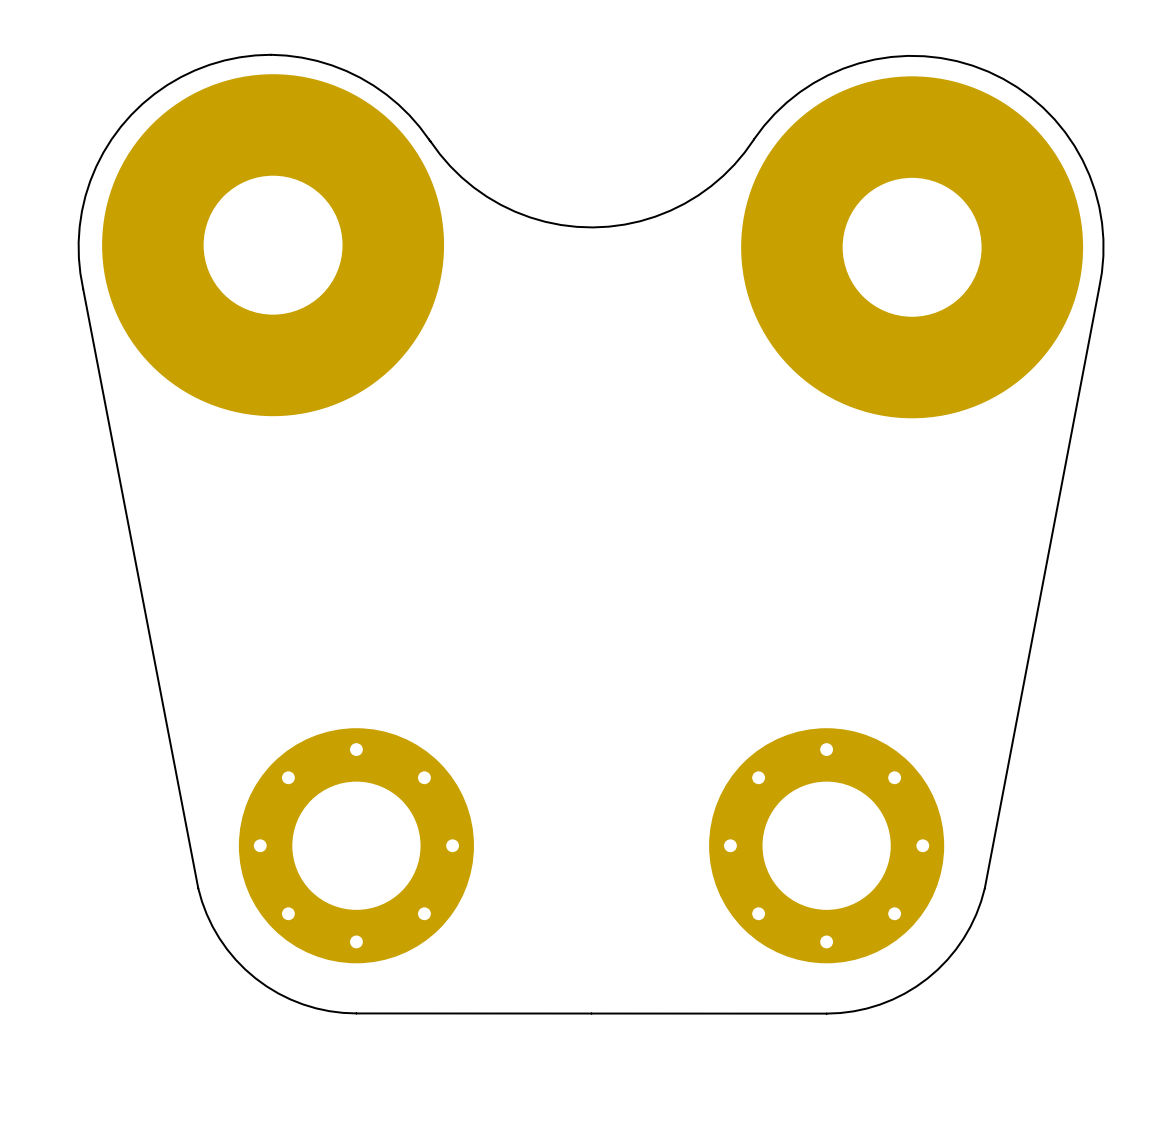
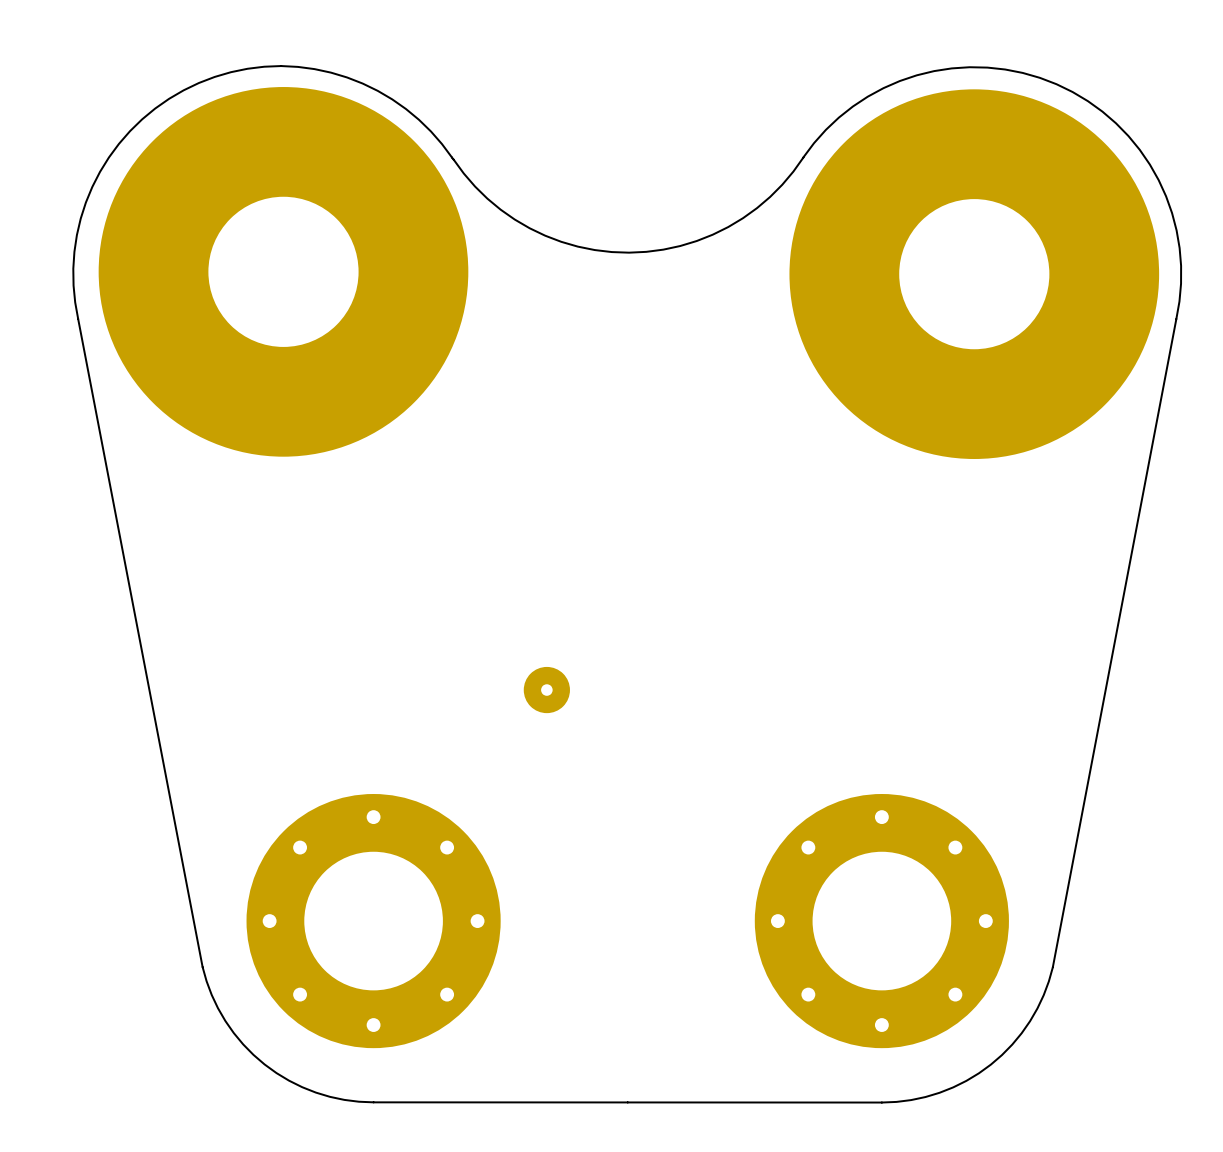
part: none -> (546, 690)

